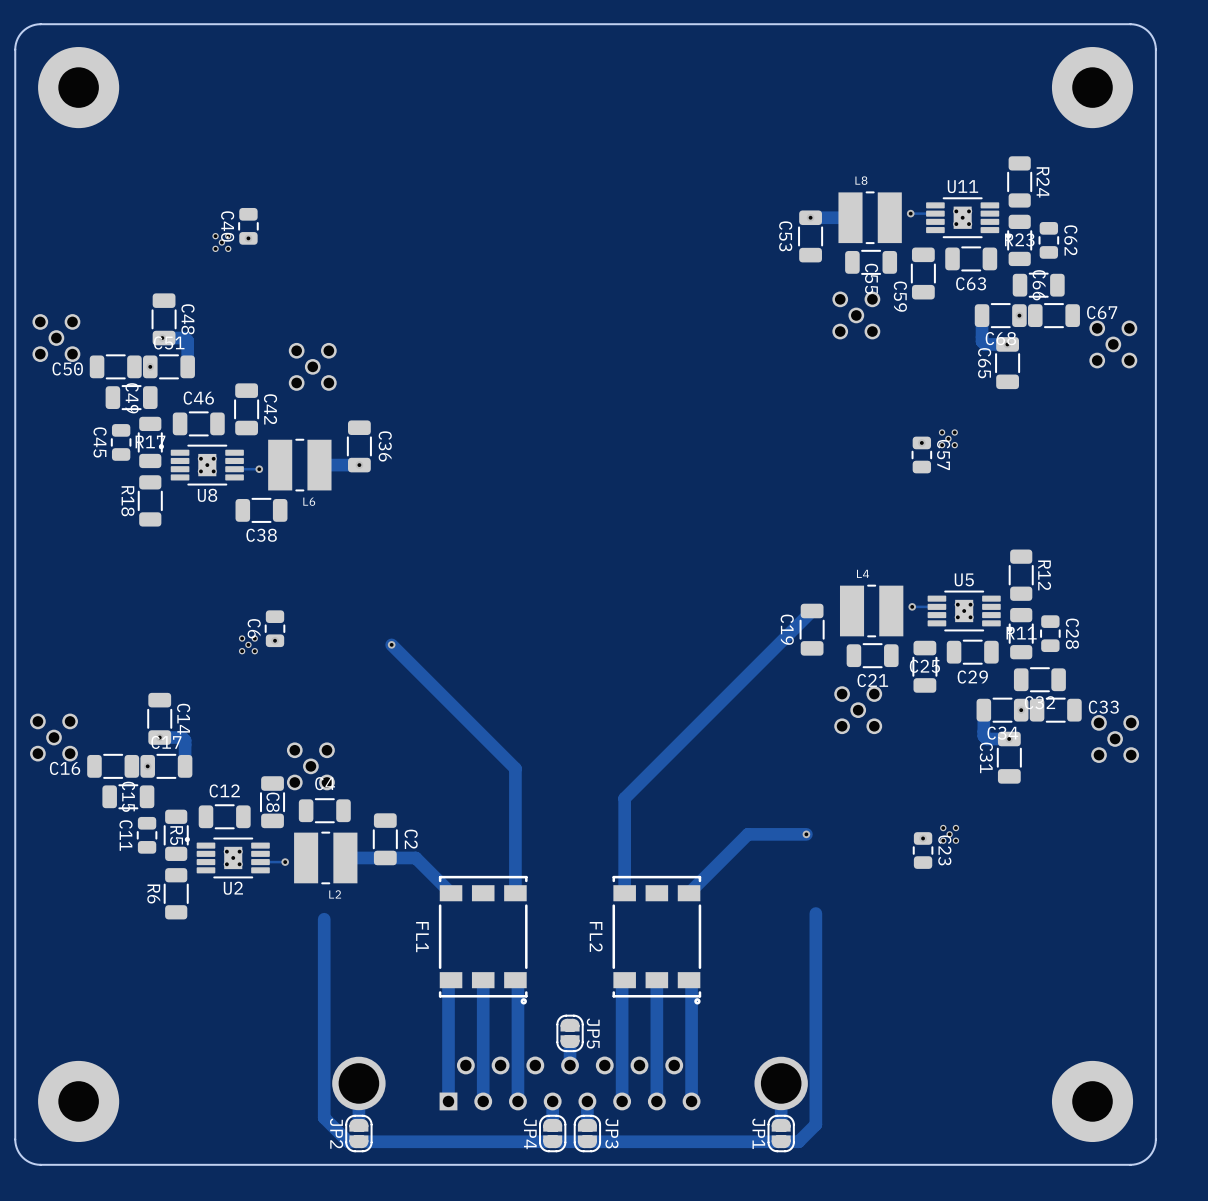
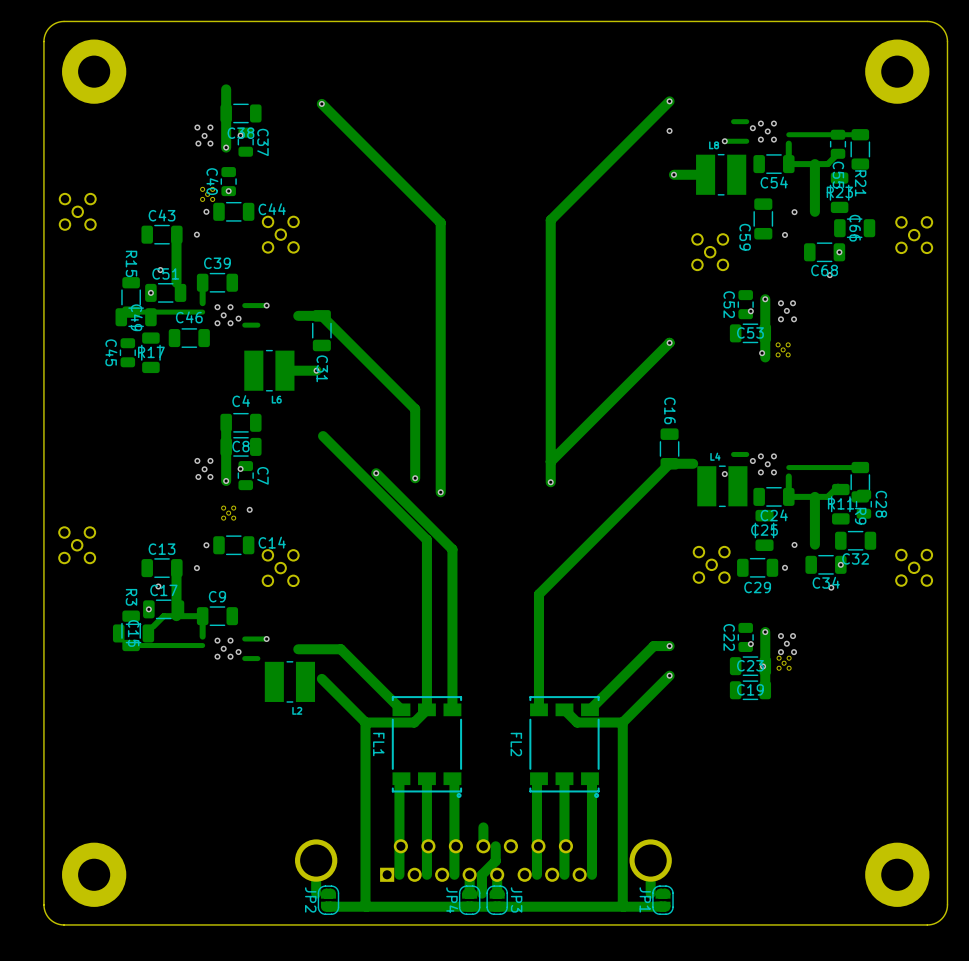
track: none -> (226, 89) (226, 147)
track: none -> (669, 101) (550, 220) (550, 482)
via: none -> (669, 101)
track: none -> (321, 103) (440, 222) (440, 492)
via: none -> (321, 103)
track: none -> (746, 121) (733, 121)
via: none -> (760, 123)
via: none -> (773, 123)
via: none -> (197, 127)
via: none -> (210, 127)
via: none -> (752, 128)
via: none -> (669, 130)
via: none -> (767, 131)
track: none -> (860, 134) (788, 134)
via: none -> (204, 135)
via: none -> (240, 135)
via: none -> (760, 139)
via: none -> (773, 139)
via: none -> (724, 141)
track: none -> (746, 141) (726, 141)
C37: none -> (245, 142)
via: none -> (198, 143)
via: none -> (210, 143)
track: none -> (788, 143) (788, 162)
R24: (1019, 181) -> none
via: none -> (226, 147)
R21: none -> (860, 149)
track: none -> (838, 153) (827, 164) (790, 164)
C54: none -> (773, 164)
track: none -> (814, 164) (814, 211)
via: (910, 213) -> none
track: (935, 213) (910, 213) -> none
U11: (968, 218) -> none
C53 name position: C53 (785, 236) -> C53 (750, 332)
C53 rotation: 0° (810, 236) -> 90° clockwise (750, 333)
C53 position: (810, 236) -> (750, 333)
C62: (1048, 240) -> none
C55 footprint: [845, 250, 898, 275] -> [830, 129, 847, 159]
C63: (971, 258) -> none
via: none -> (206, 211)
C44: none -> (233, 211)
via: none -> (794, 212)
C43: none -> (162, 234)
track: none -> (176, 234) (176, 282)
via: none -> (196, 234)
via: none -> (784, 234)
track: (982, 315) (982, 341) (984, 344) (1007, 344) -> none
C67: (1053, 315) -> none
C48: (164, 319) -> none
part position: (56, 338) -> (77, 211)
track: (162, 338) (184, 338) (187, 340) (187, 366) -> none
part position: (1113, 344) -> (914, 235)
C39: none -> (217, 282)
track: none -> (202, 283) (202, 303)
C65: (1007, 363) -> none
C50: (115, 366) -> none
part position: (312, 366) -> (280, 234)
R15: none -> (131, 297)
track: none -> (765, 299) (765, 357)
via: none -> (765, 299)
via: none -> (780, 303)
via: none -> (793, 303)
C52: none -> (745, 304)
track: none -> (265, 305) (244, 305)
via: none -> (266, 305)
via: none -> (217, 307)
via: none -> (230, 307)
via: none -> (786, 310)
via: none -> (750, 311)
track: none -> (202, 312) (131, 312)
via: none -> (223, 315)
track: none -> (298, 315) (321, 315) (415, 409) (415, 478)
via: none -> (238, 318)
via: none -> (780, 319)
via: none -> (794, 319)
via: none -> (217, 323)
via: none -> (230, 323)
track: none -> (257, 325) (244, 325)
C42: (246, 409) -> none
track: none -> (669, 342) (550, 461)
via: none -> (669, 342)
C36: (359, 446) -> none
C57: (921, 454) -> none
U8: (201, 464) -> none
track: (259, 469) (234, 469) -> none
via: (259, 469) -> none
R18: (150, 500) -> none
C38 position: (261, 510) -> (240, 113)
track: none -> (226, 422) (226, 481)
track: none -> (323, 436) (426, 539) (426, 709) (414, 722) (365, 722)
track: none -> (746, 454) (733, 454)
via: none -> (760, 456)
via: none -> (773, 456)
R12: (1021, 575) -> none
via: none -> (197, 460)
via: none -> (210, 460)
via: none -> (752, 461)
track: none -> (693, 463) (669, 463) (538, 594) (538, 709)
via: none -> (767, 464)
track: none -> (860, 467) (788, 467)
via: none -> (204, 469)
via: none -> (240, 468)
via: none -> (760, 472)
via: none -> (773, 472)
track: none -> (376, 473) (452, 549) (452, 709)
via: none -> (376, 473)
via: none -> (724, 474)
C7: none -> (245, 475)
track: none -> (788, 476) (788, 495)
via: none -> (198, 476)
via: none -> (210, 476)
via: none -> (415, 478)
via: none -> (226, 481)
via: none -> (550, 482)
R9: none -> (860, 482)
via: (912, 606) -> none
track: (936, 606) (912, 606) -> none
track: (812, 610) (624, 798) (624, 893) -> none
U5: (970, 611) -> none
track: none -> (838, 486) (827, 496) (790, 496)
via: none -> (440, 492)
C24: none -> (773, 496)
track: none -> (814, 496) (814, 544)
C6: (275, 628) -> none
C19 name position: C19 (787, 629) -> C19 (750, 689)
C19 rotation: 0° (812, 629) -> 90° clockwise (750, 690)
C19 position: (812, 629) -> (750, 690)
track: (391, 644) (515, 768) (515, 893) -> none
via: (391, 644) -> none
C29 position: (972, 652) -> (757, 567)
C21: (872, 655) -> none
via: none -> (206, 545)
via: none -> (794, 544)
track: (983, 710) (983, 736) (986, 738) (1009, 738) -> none
C33: (1055, 710) -> none
via: none -> (784, 567)
C13: none -> (162, 568)
track: none -> (176, 568) (176, 616)
via: none -> (196, 568)
C14 rotation: 0° (159, 718) -> 90° clockwise (233, 545)
C14 position: (159, 718) -> (233, 545)
part position: (54, 737) -> (77, 545)
track: (159, 737) (182, 737) (185, 740) (185, 766) -> none
part position: (1115, 738) -> (914, 567)
C31 name position: C31 (986, 757) -> C31 (322, 368)
C31 position: (1009, 757) -> (321, 330)
C16 rotation: 0° (113, 766) -> 90° clockwise (669, 448)
C16 position: (113, 766) -> (669, 448)
part position: (310, 766) -> (280, 568)
track: none -> (201, 616) (163, 616) (153, 626)
C9: none -> (217, 616)
track: none -> (202, 617) (202, 636)
R3: none -> (131, 630)
track: none -> (765, 632) (765, 690)
via: none -> (765, 632)
via: none -> (780, 636)
via: none -> (793, 636)
C22: none -> (745, 637)
C8 rotation: 0° (272, 802) -> 90° clockwise (240, 446)
C8 position: (272, 802) -> (240, 446)
track: none -> (265, 638) (244, 638)
via: none -> (266, 638)
via: none -> (217, 640)
via: none -> (230, 640)
via: none -> (786, 643)
C4 position: (324, 810) -> (240, 422)
via: none -> (750, 644)
track: none -> (202, 645) (131, 645)
track: none -> (669, 646) (653, 646) (589, 709)
via: none -> (669, 646)
C12: (224, 816) -> none
via: none -> (223, 648)
track: none -> (298, 649) (340, 649) (401, 709)
via: none -> (238, 652)
via: none -> (780, 652)
via: none -> (794, 652)
via: none -> (217, 656)
via: none -> (230, 656)
track: none -> (257, 658) (244, 658)
C23 footprint: [912, 832, 934, 869] -> [729, 656, 772, 676]
track: (806, 834) (747, 834) (689, 893) -> none
via: (806, 834) -> none
C11: (147, 835) -> none
R5: (176, 835) -> none
C2: (385, 839) -> none
track: none -> (669, 675) (622, 722)
via: none -> (669, 675)
track: none -> (321, 678) (365, 722)
U2: (227, 857) -> none
track: (345, 857) (415, 857) (451, 893) -> none
track: (285, 862) (260, 862) -> none
via: (285, 862) -> none
R6: (176, 893) -> none
track: none -> (564, 709) (577, 722) (622, 722)
track: none -> (365, 722) (366, 906)
track: none -> (622, 722) (623, 906)
track: (815, 913) (815, 1124) (796, 1141) -> none
track: (324, 919) (324, 1117) (348, 1141) (374, 1141) -> none
FL1 position: (483, 940) -> (426, 747)
FL2 position: (656, 940) -> (564, 747)
track: (451, 980) (448, 982) (448, 1101) -> (401, 778) (399, 780) (399, 874)
track: (483, 980) (483, 1101) -> (426, 778) (426, 874)
track: (515, 980) (517, 982) (517, 1101) -> (452, 778) (454, 780) (454, 874)
track: (624, 980) (622, 982) (622, 1101) -> (538, 778) (536, 780) (536, 874)
track: (656, 980) (656, 1101) -> (564, 778) (564, 874)
track: (689, 980) (691, 982) (691, 1101) -> (589, 778) (591, 780) (591, 874)
JP5: (570, 1033) -> none
track: none -> (495, 846) (495, 861) (481, 874) (481, 893)
JP2 position: (358, 1133) -> (328, 900)
JP1 position: (781, 1133) -> (662, 900)

